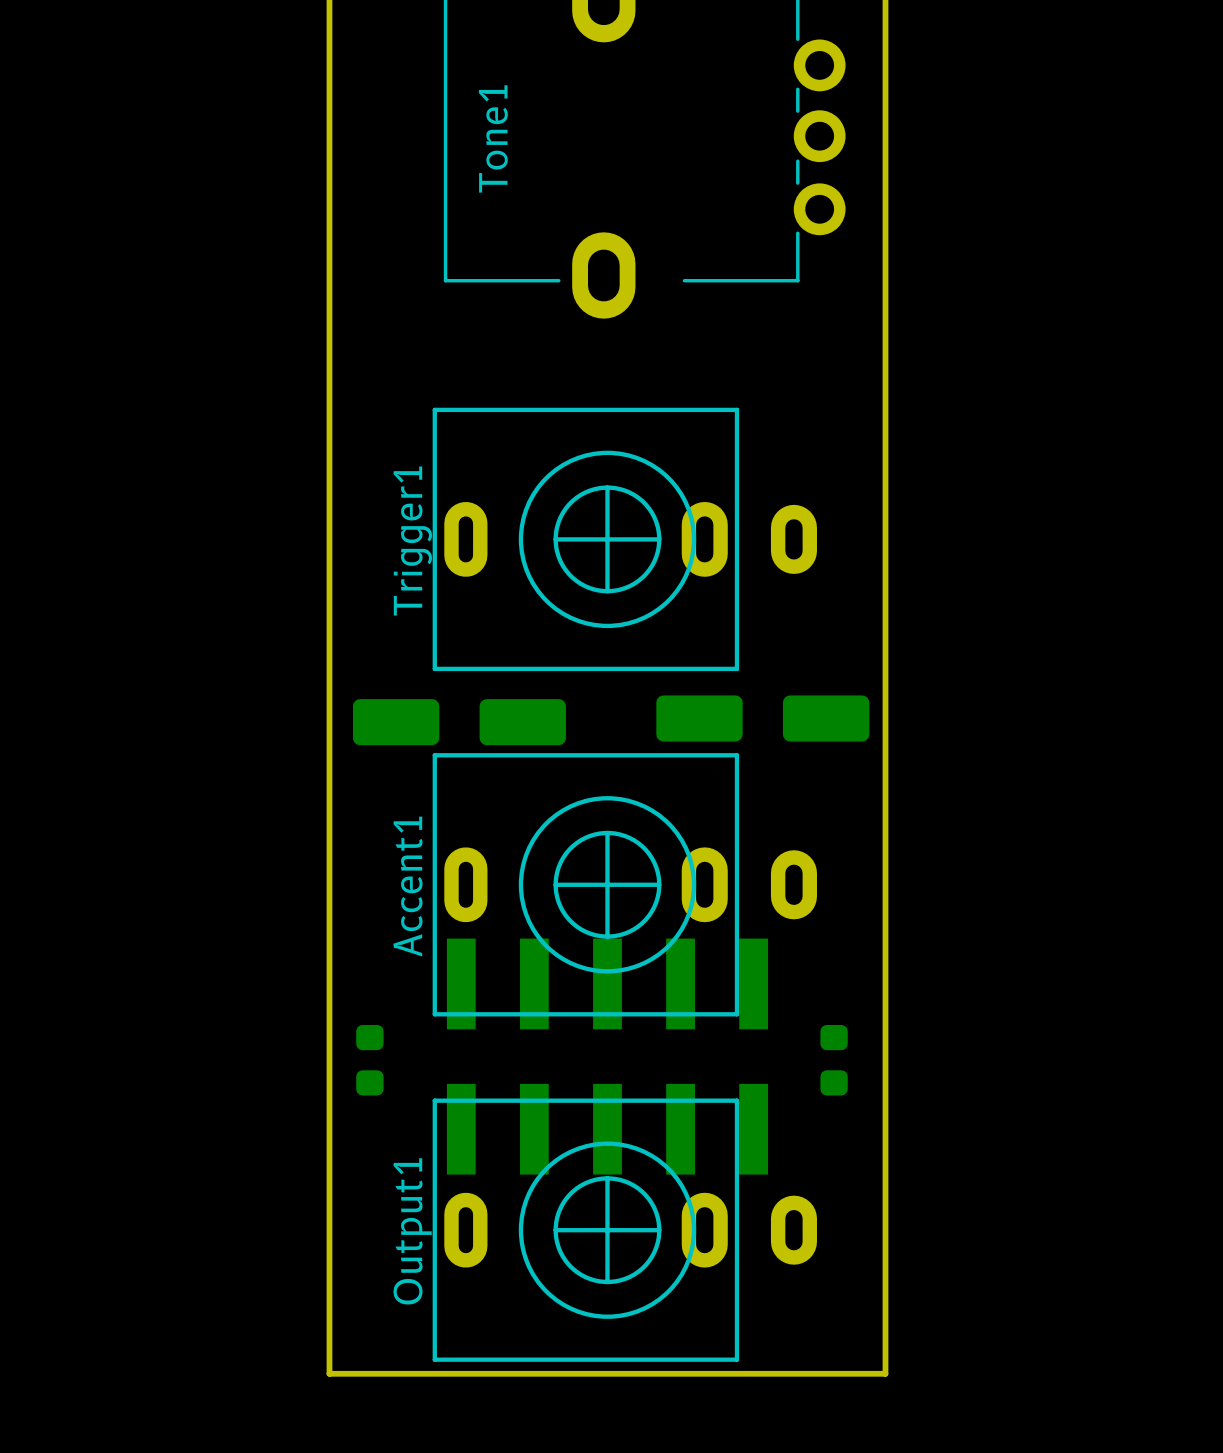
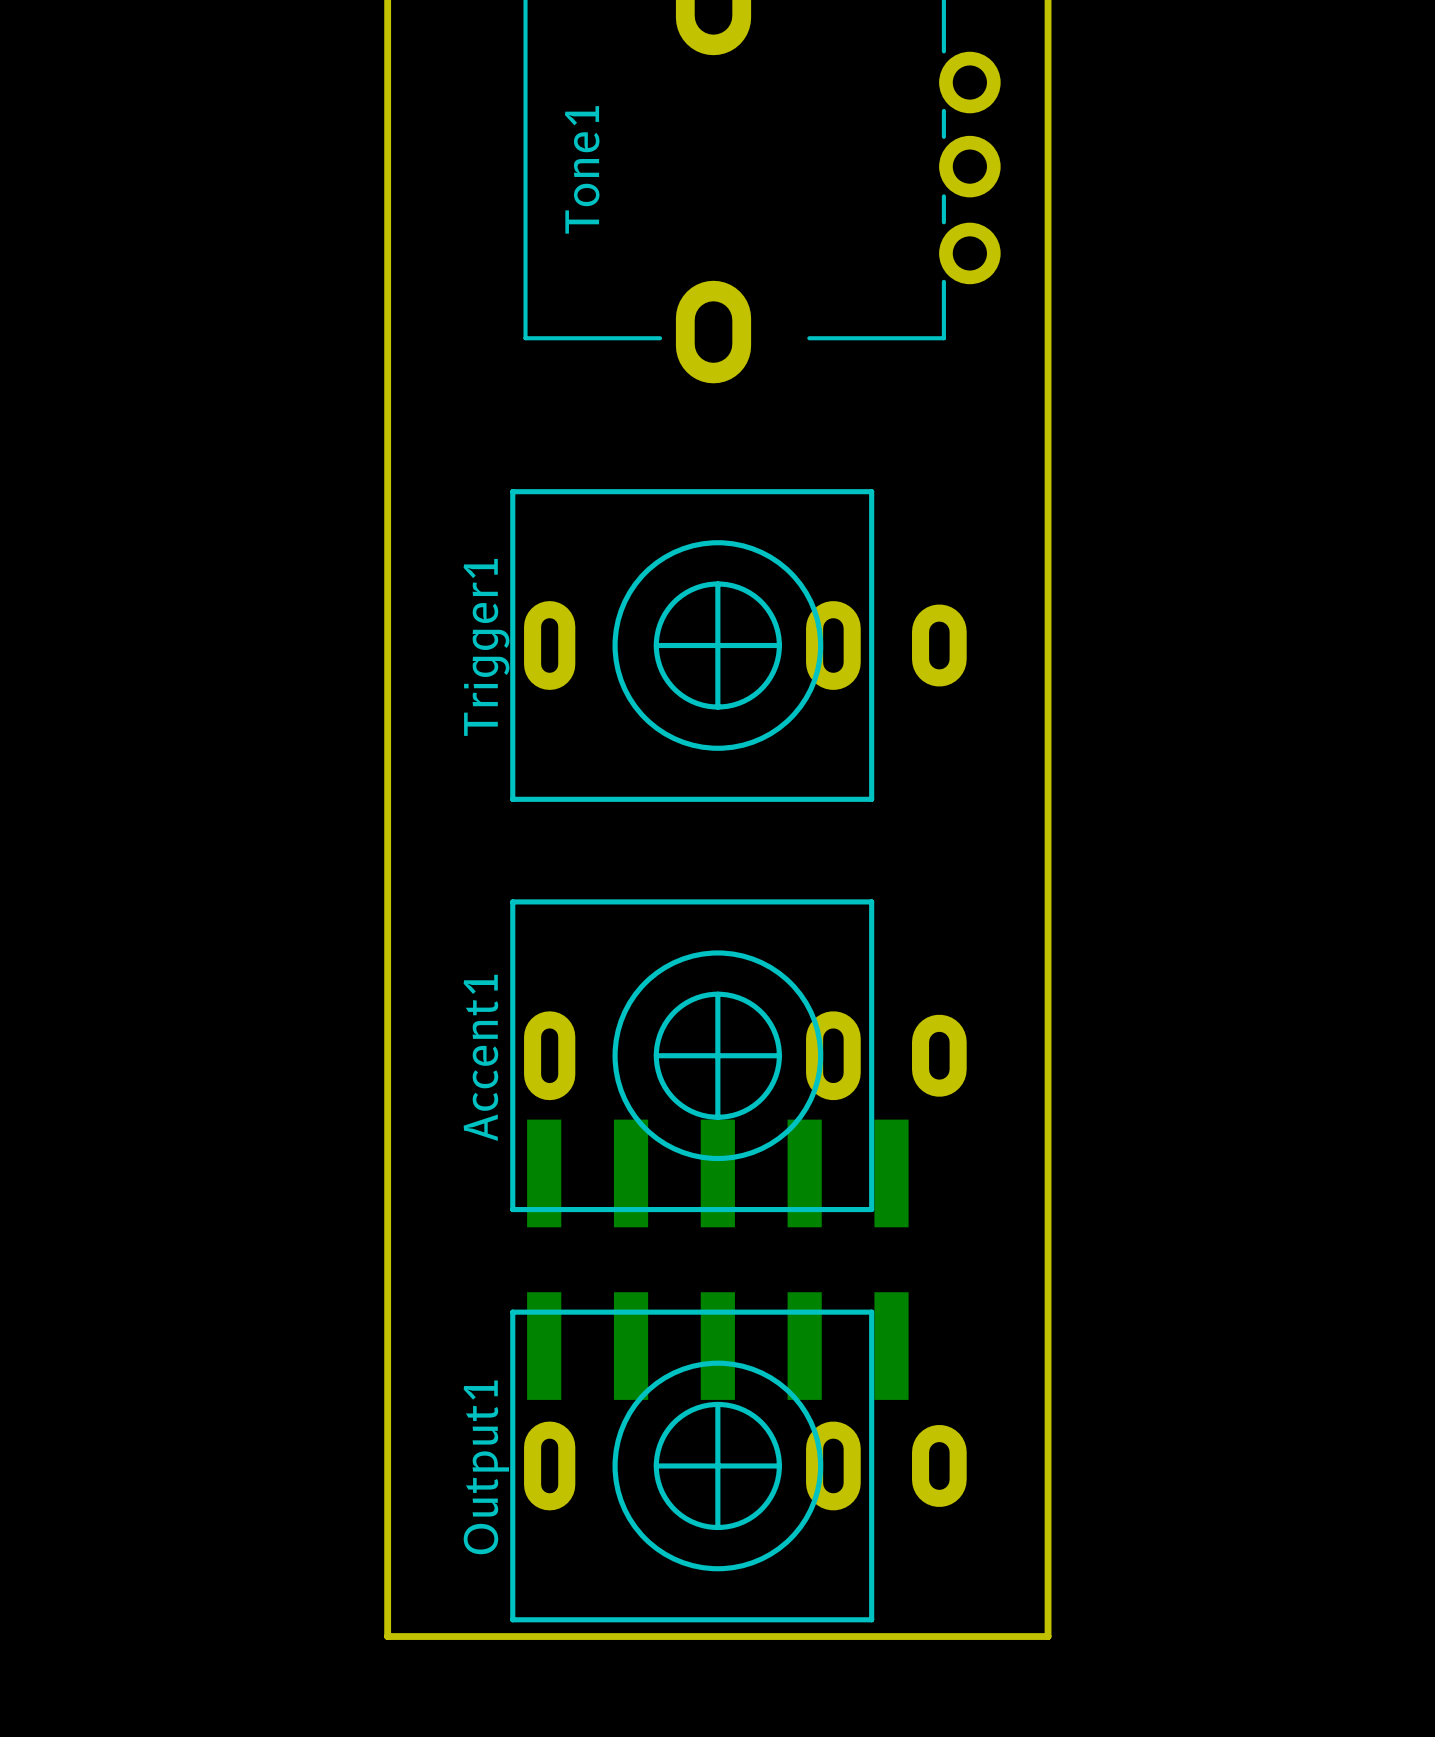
part: (762, 718) -> none
part: (459, 722) -> none
part: (369, 1060) -> none
part: (834, 1060) -> none

